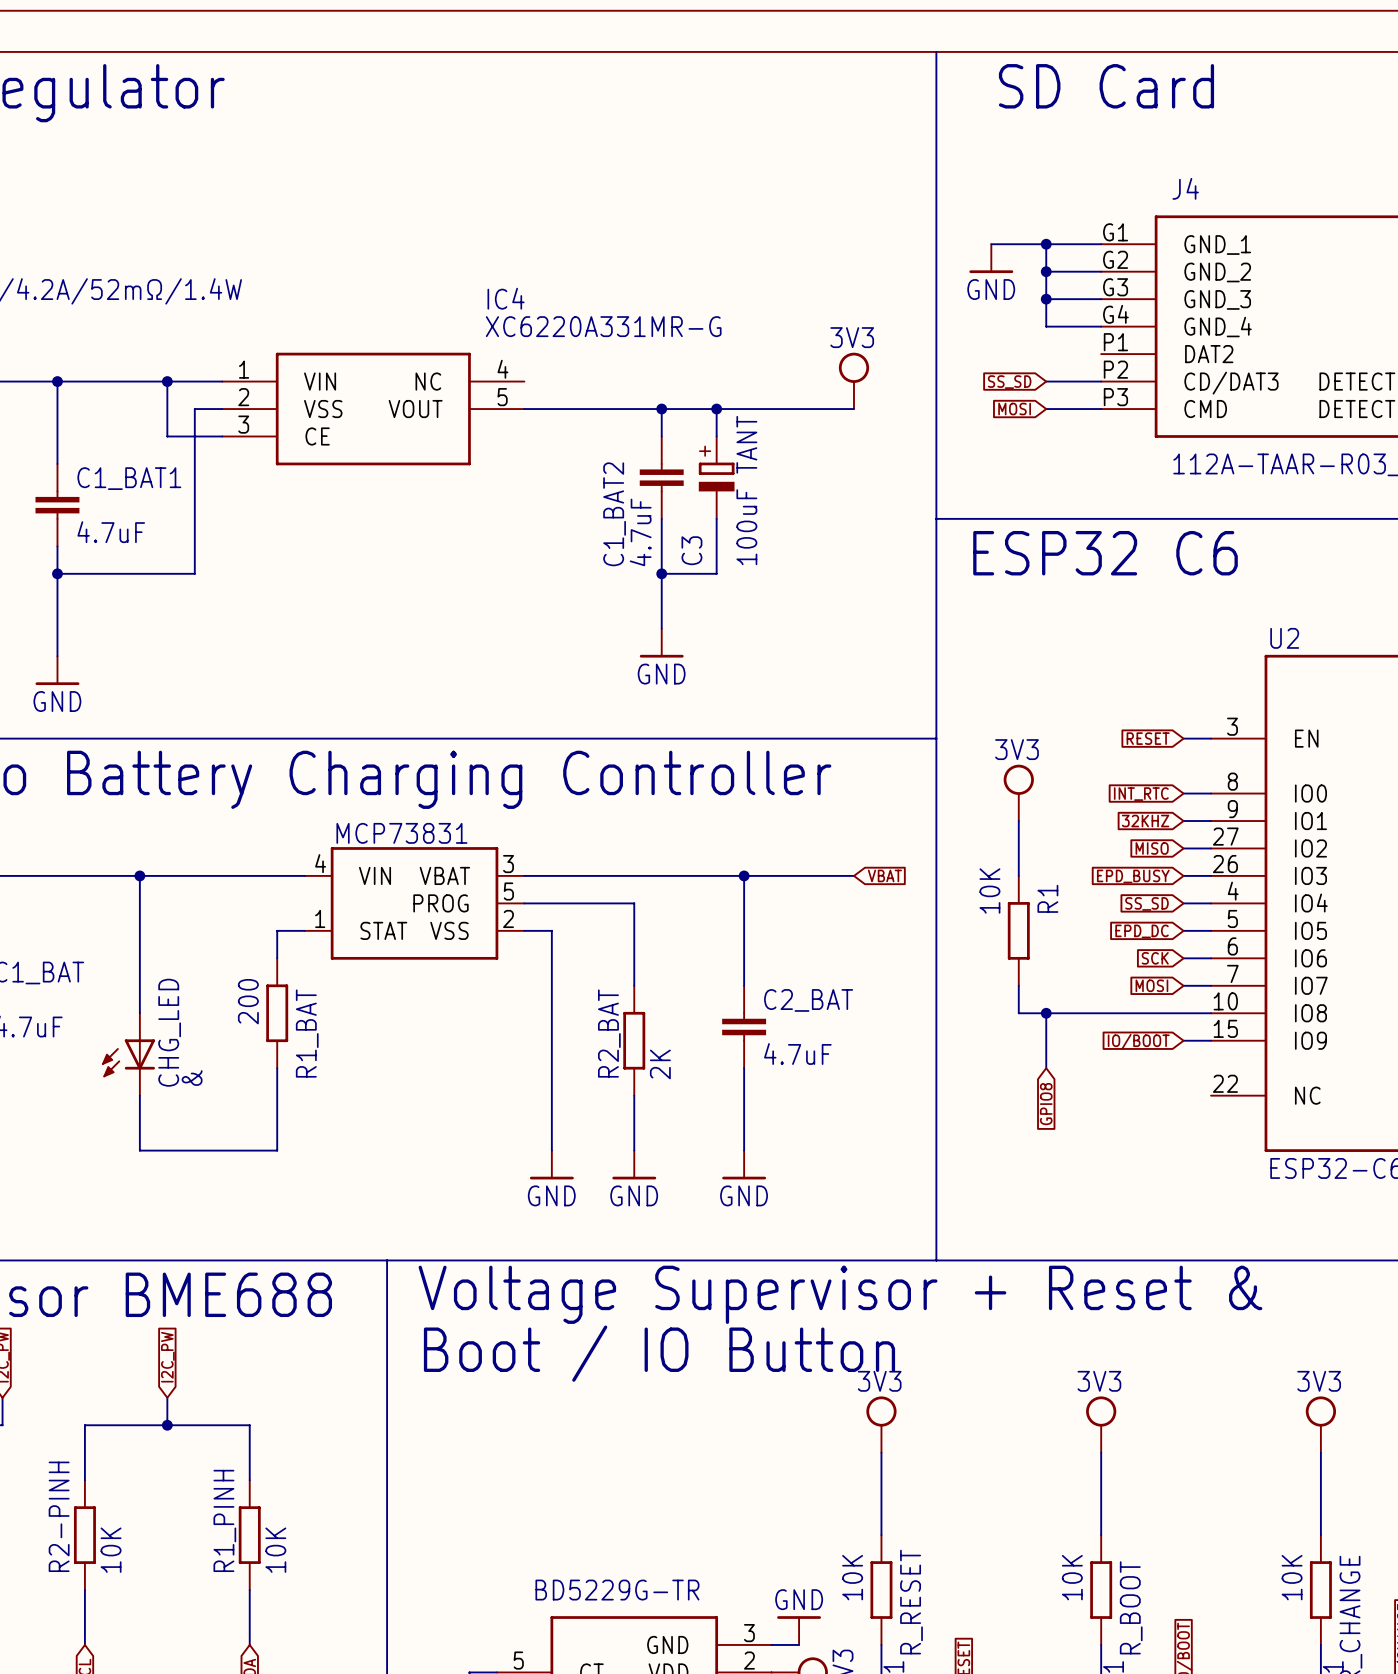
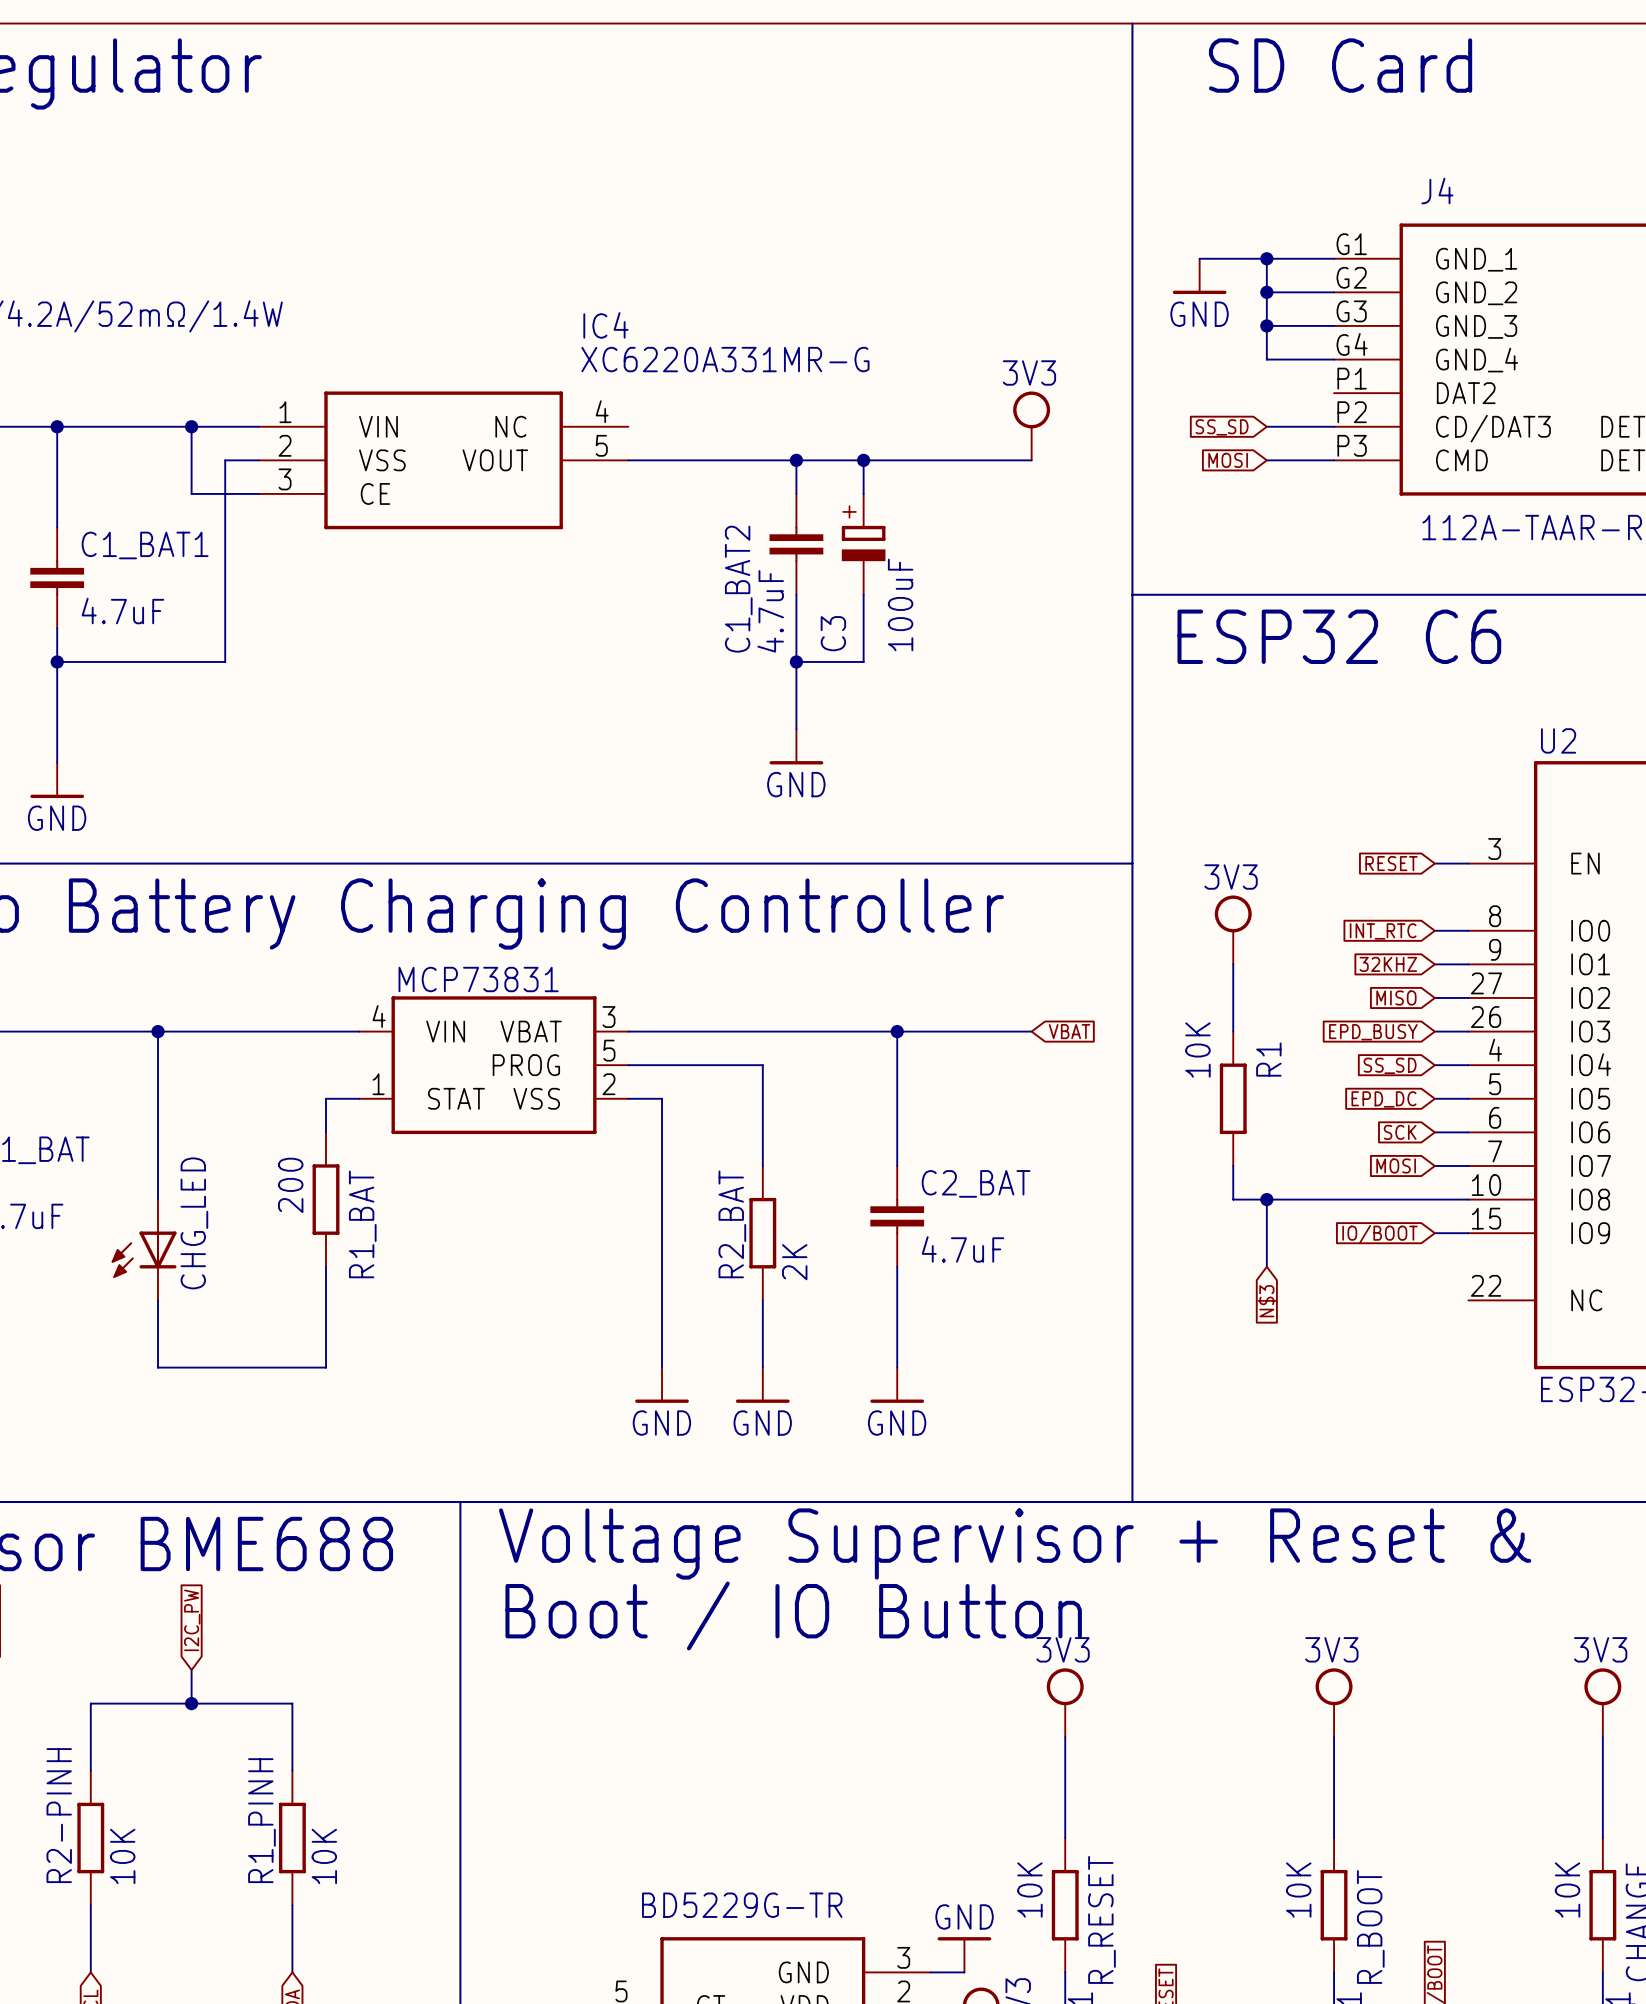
C3 value: 100uF TANT (746, 490) -> 100uF (900, 604)
CHG_LED value: & (192, 1078) -> none
global label: GPIO8 (1046, 1104) -> N$3 (1266, 1301)

